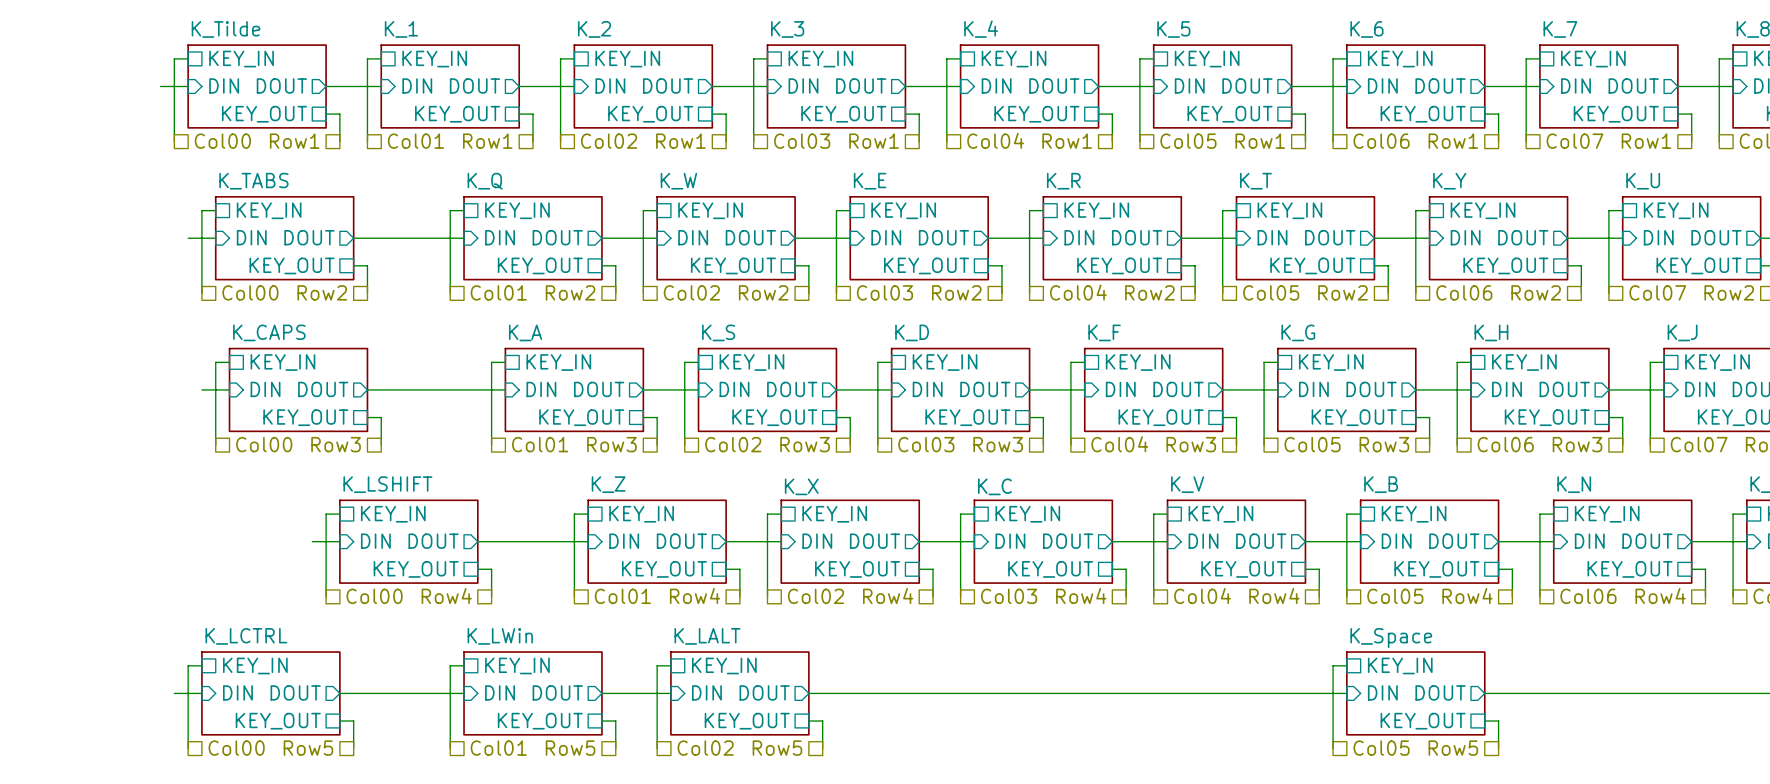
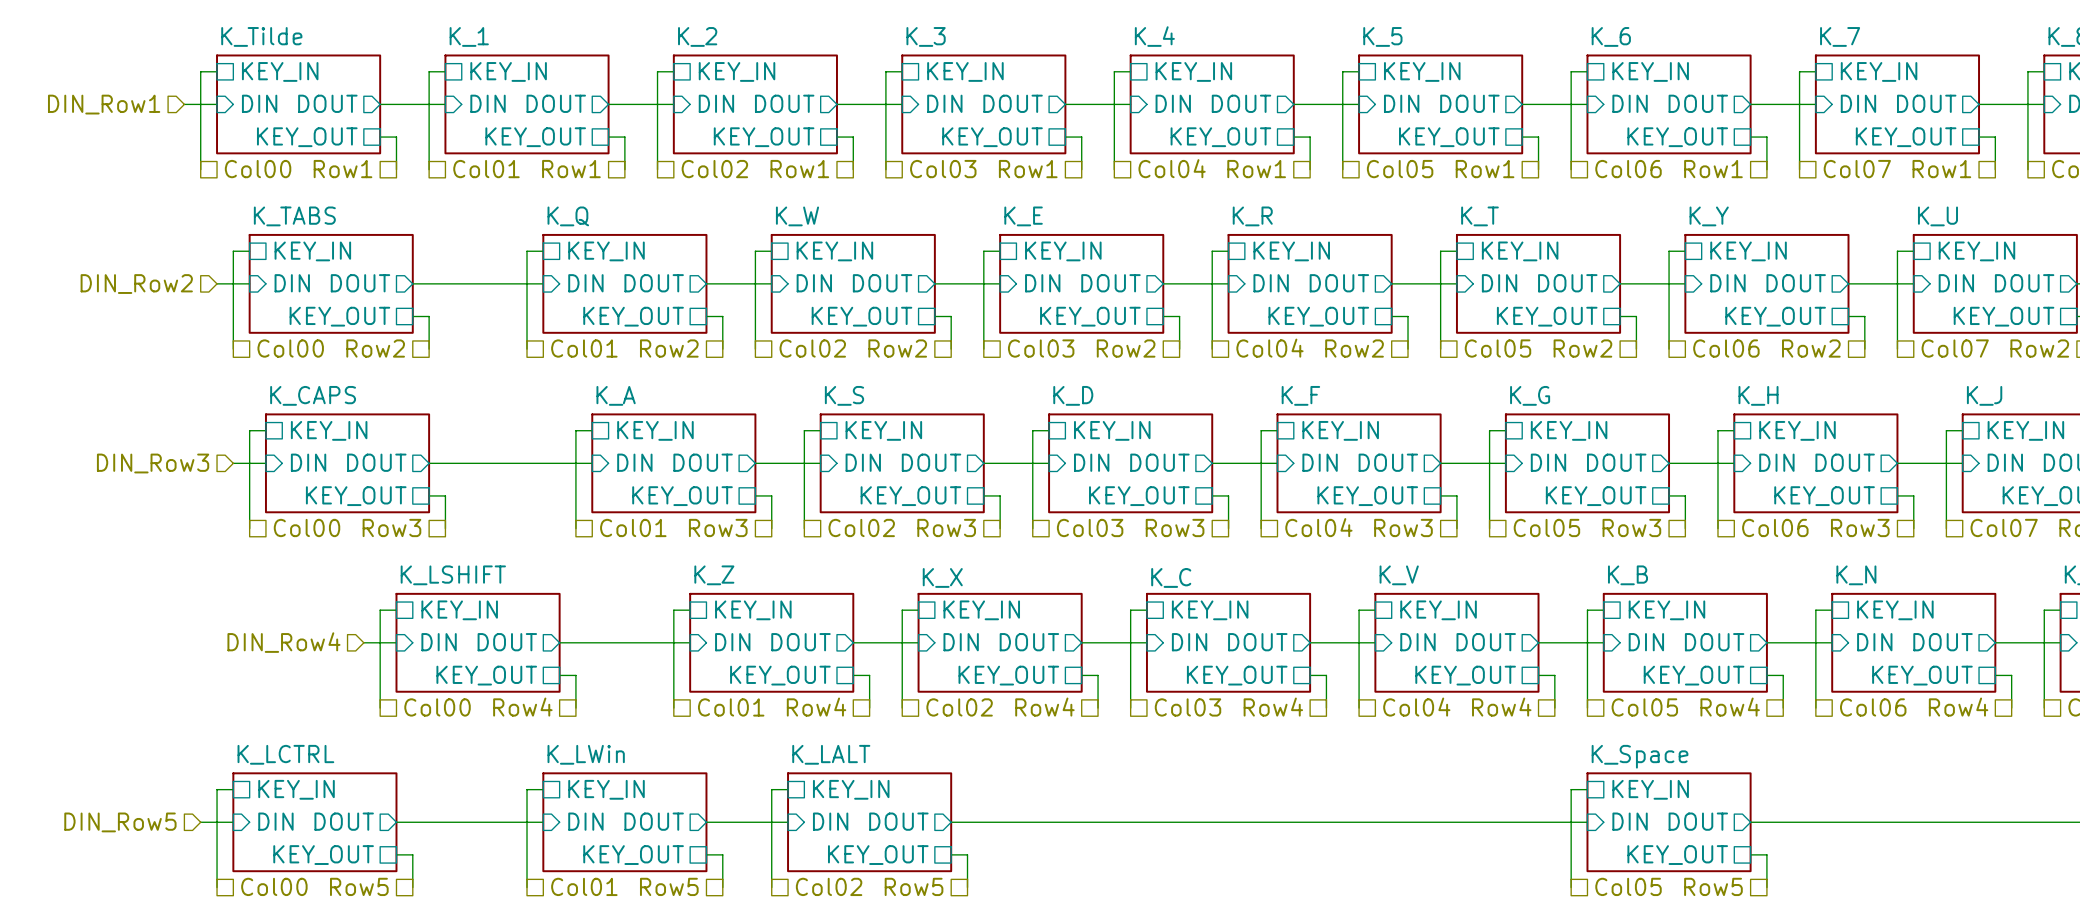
hierarchical label: none -> DIN_Row1 (104, 104)
hierarchical label: none -> DIN_Row2 (136, 284)
hierarchical label: none -> DIN_Row3 (153, 463)
hierarchical label: none -> DIN_Row4 (283, 642)
hierarchical label: none -> DIN_Row5 (120, 822)

